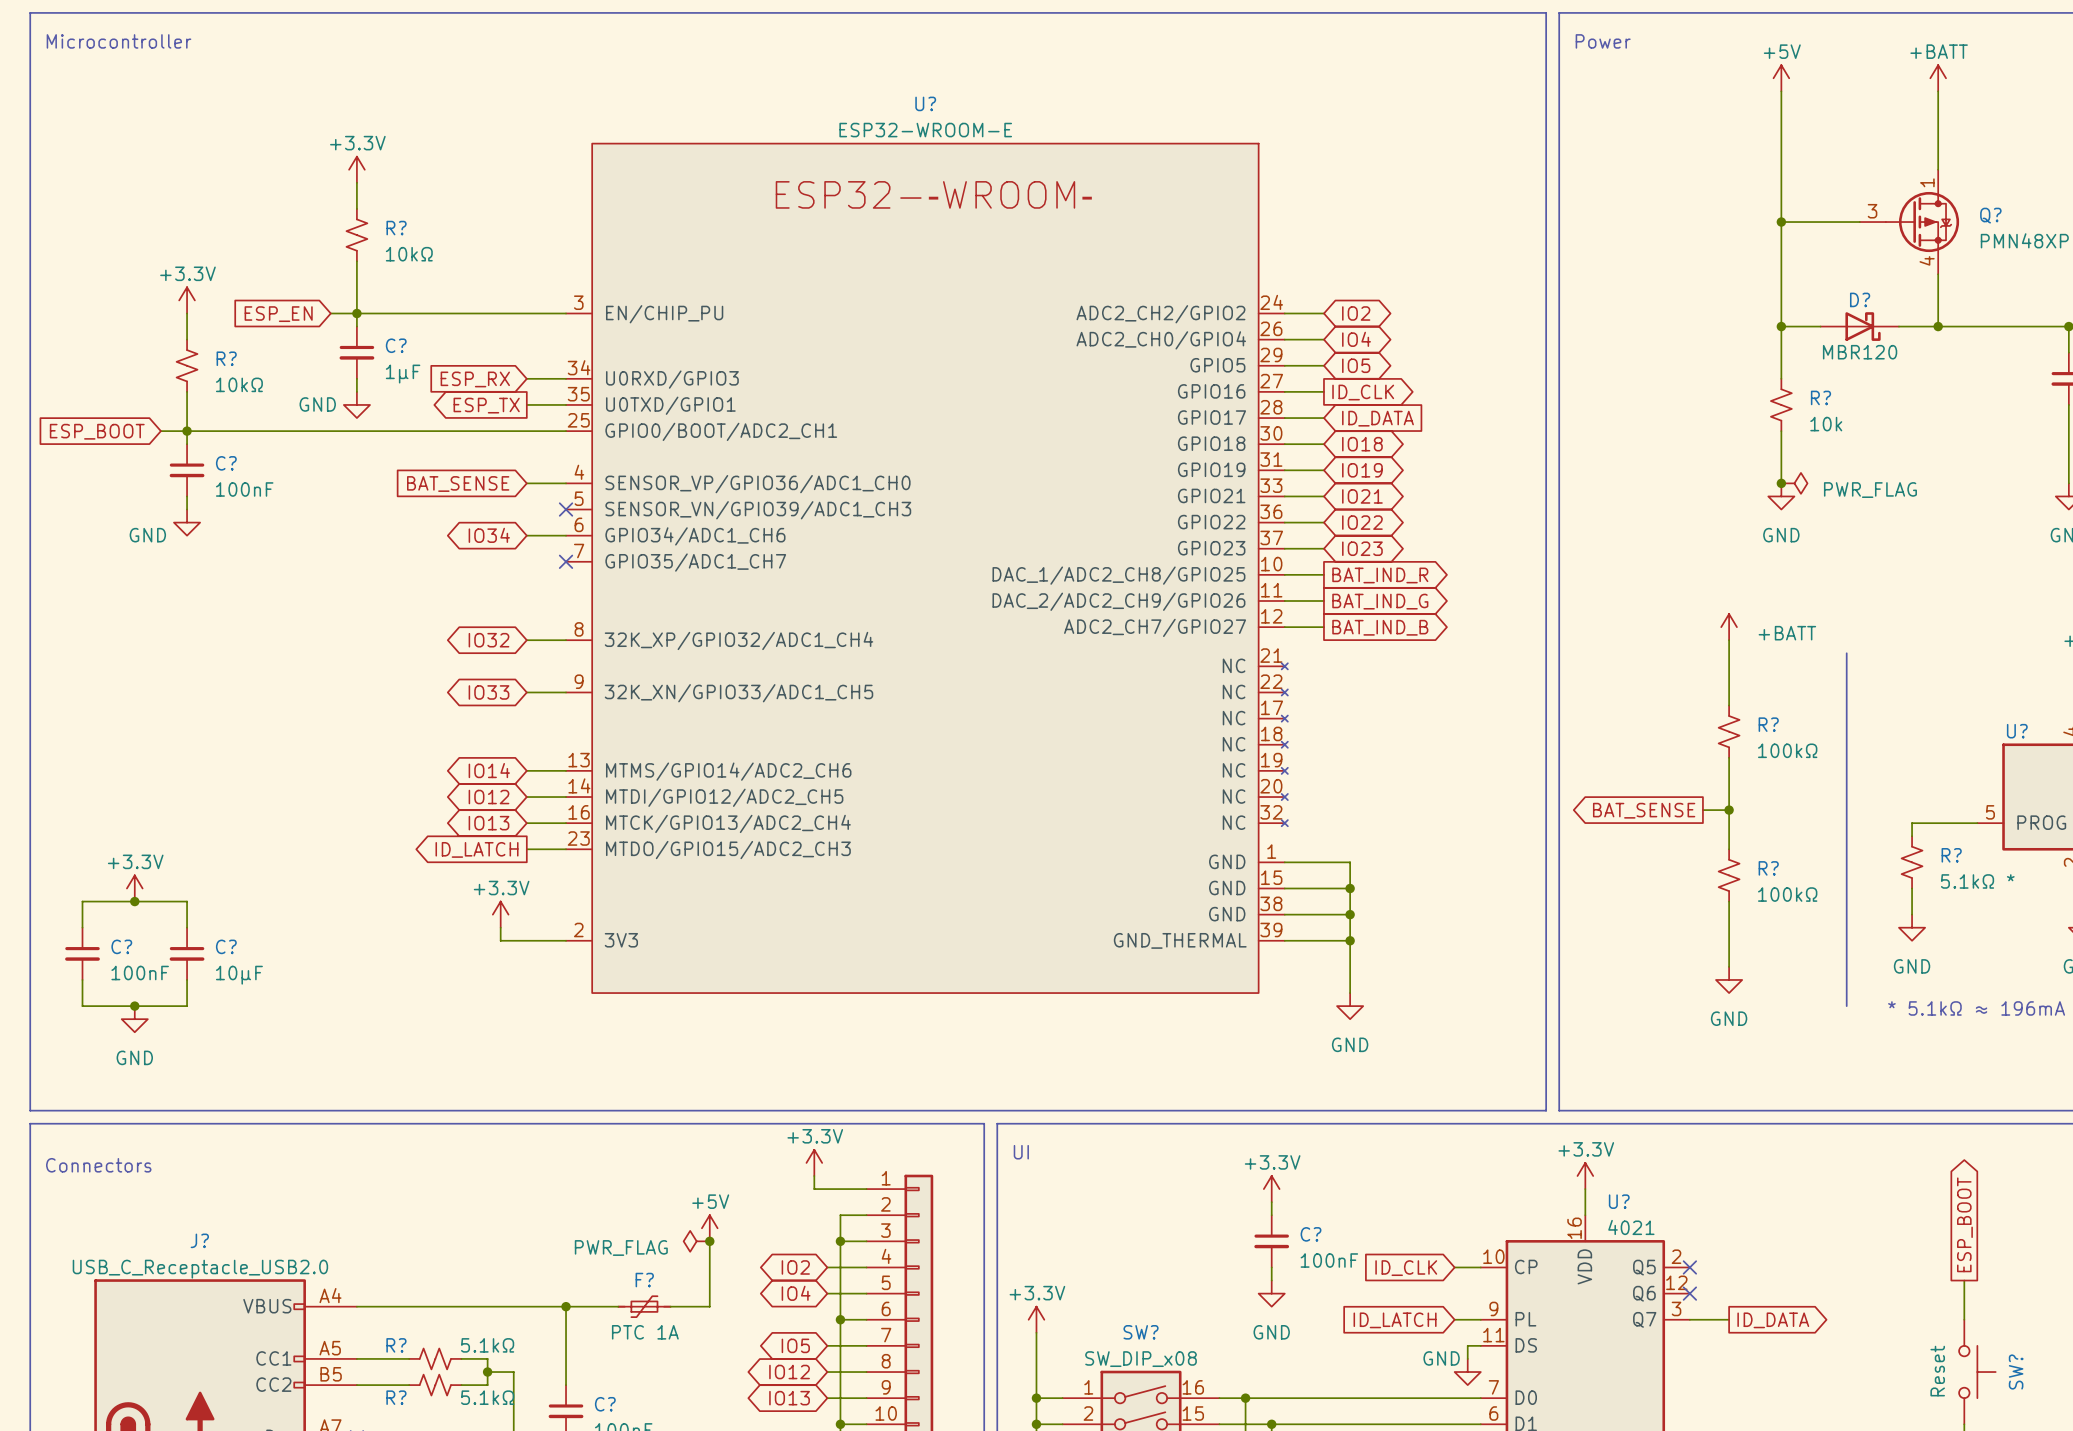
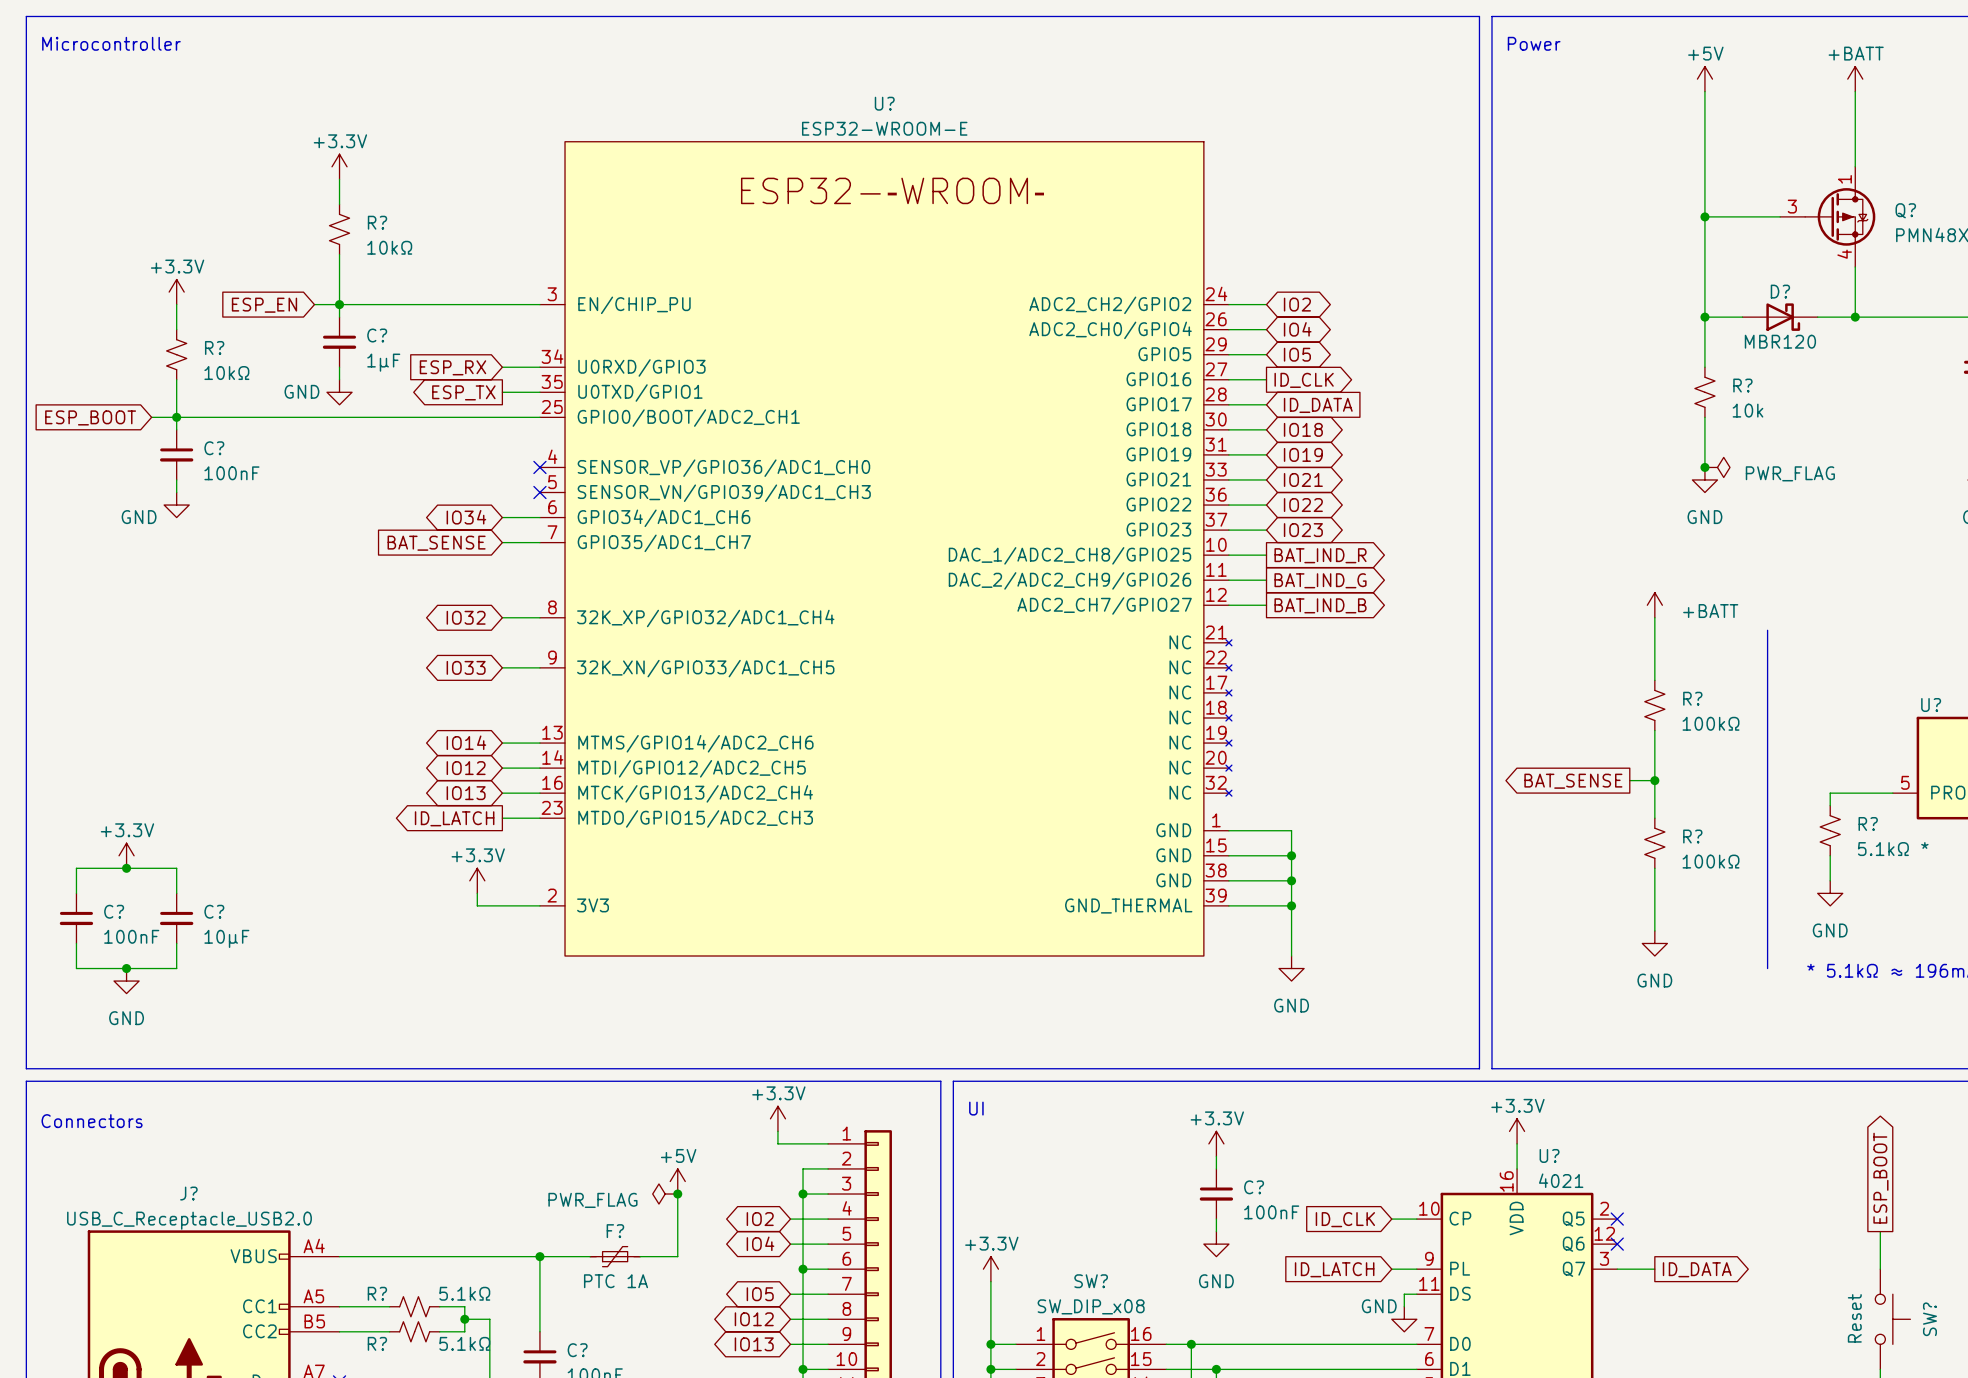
wire: (526, 483) (566, 483) -> (502, 542) (539, 542)
no-connect mark: none -> (539, 467)
global label position: BAT_SENSE (458, 484) -> BAT_SENSE (436, 543)
no-connect mark: (566, 561) -> none

